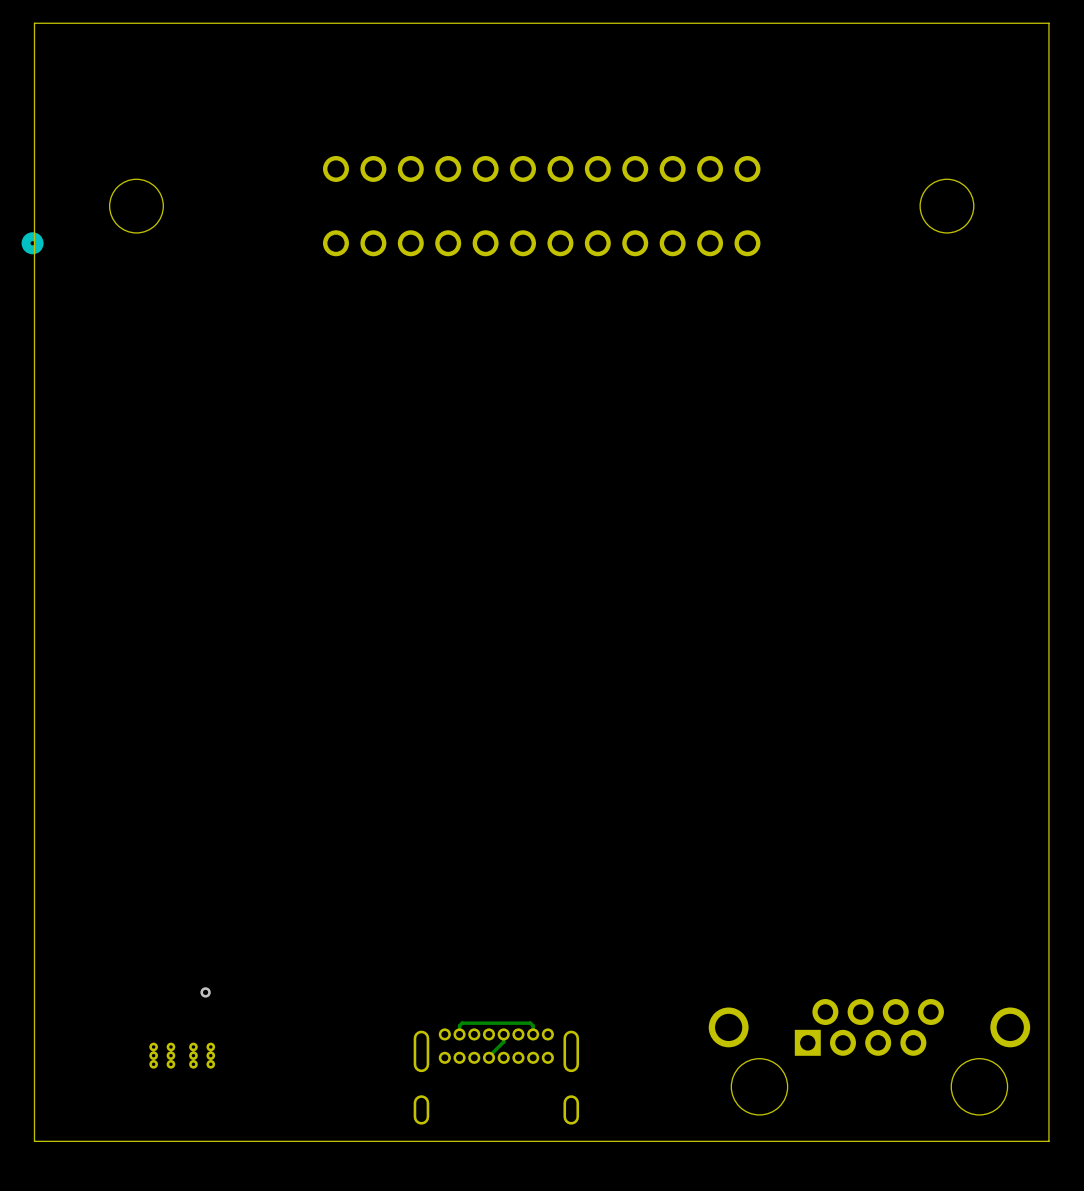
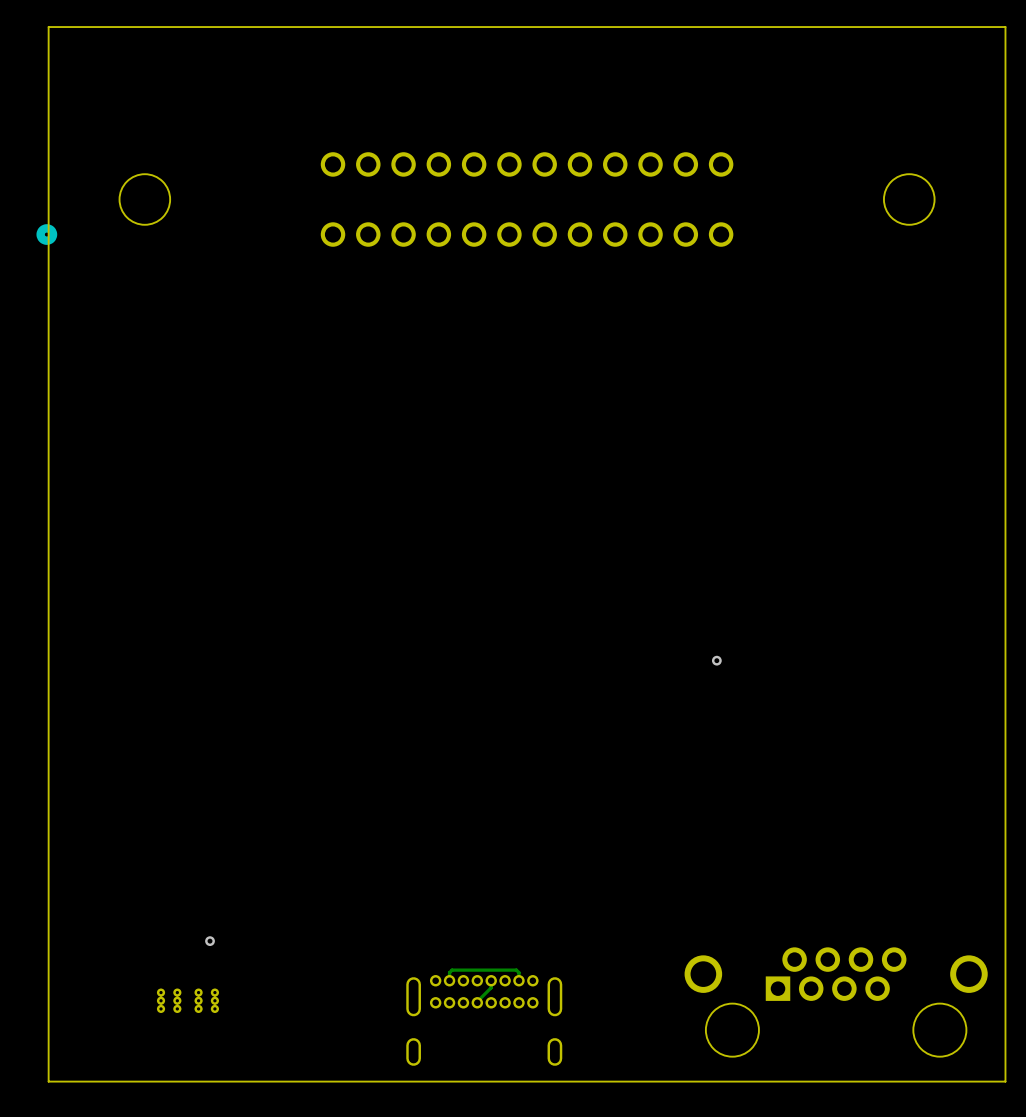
via: none -> (716, 660)

